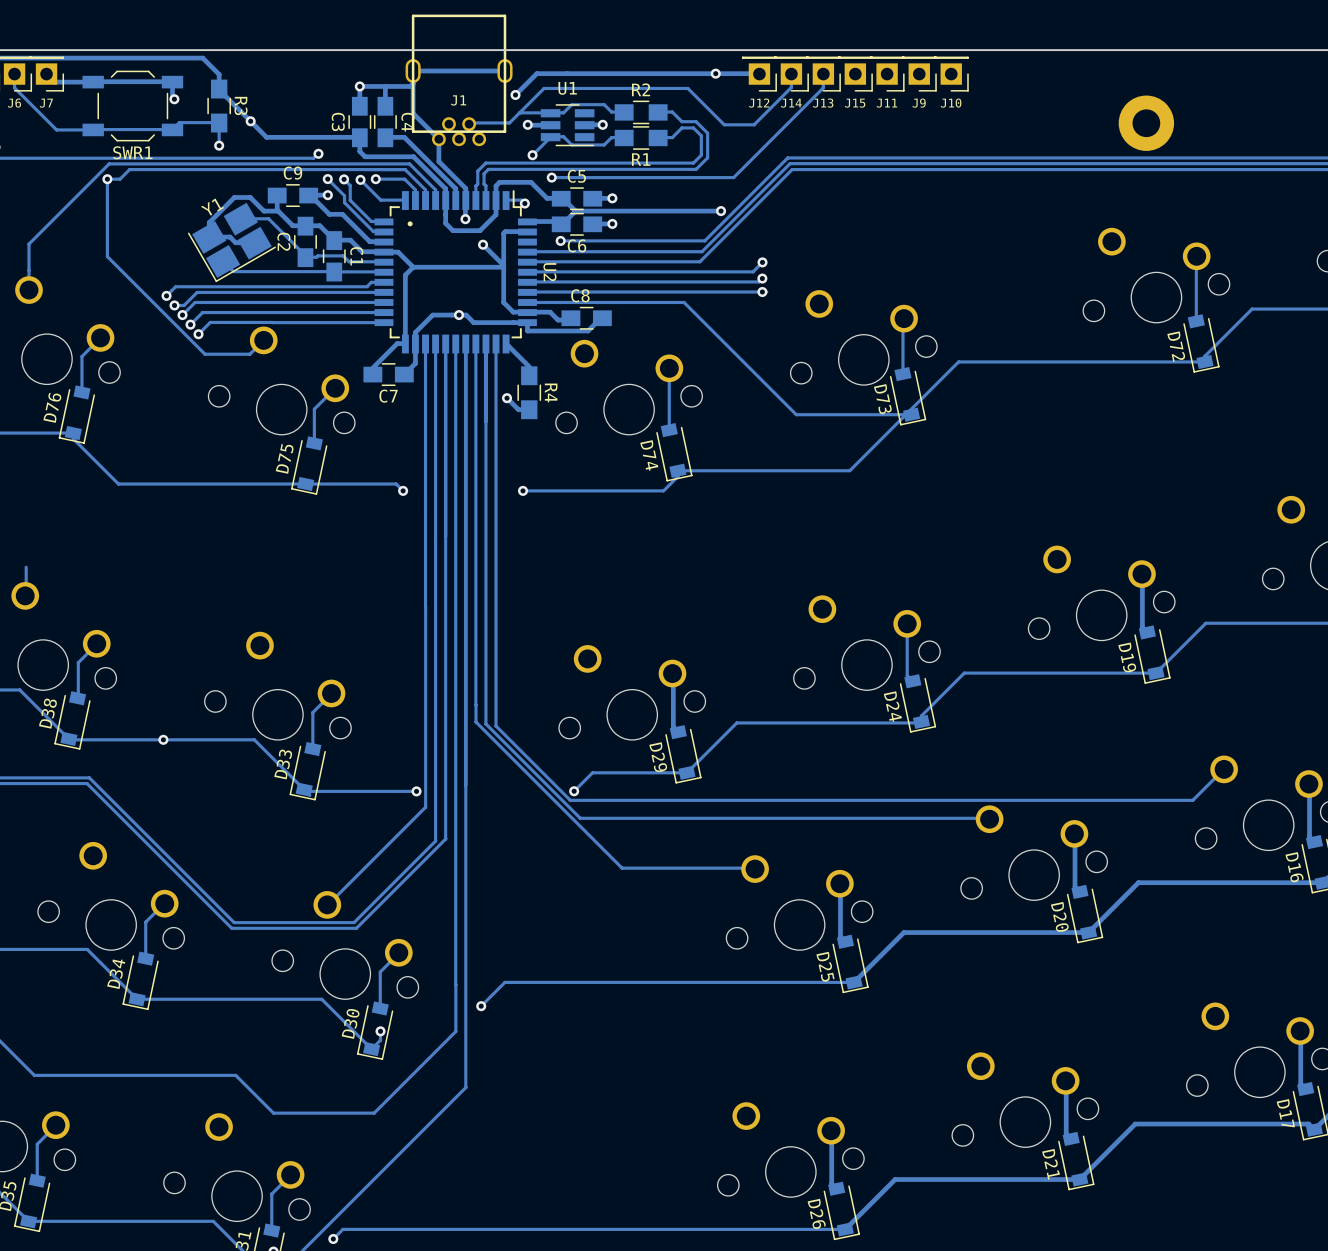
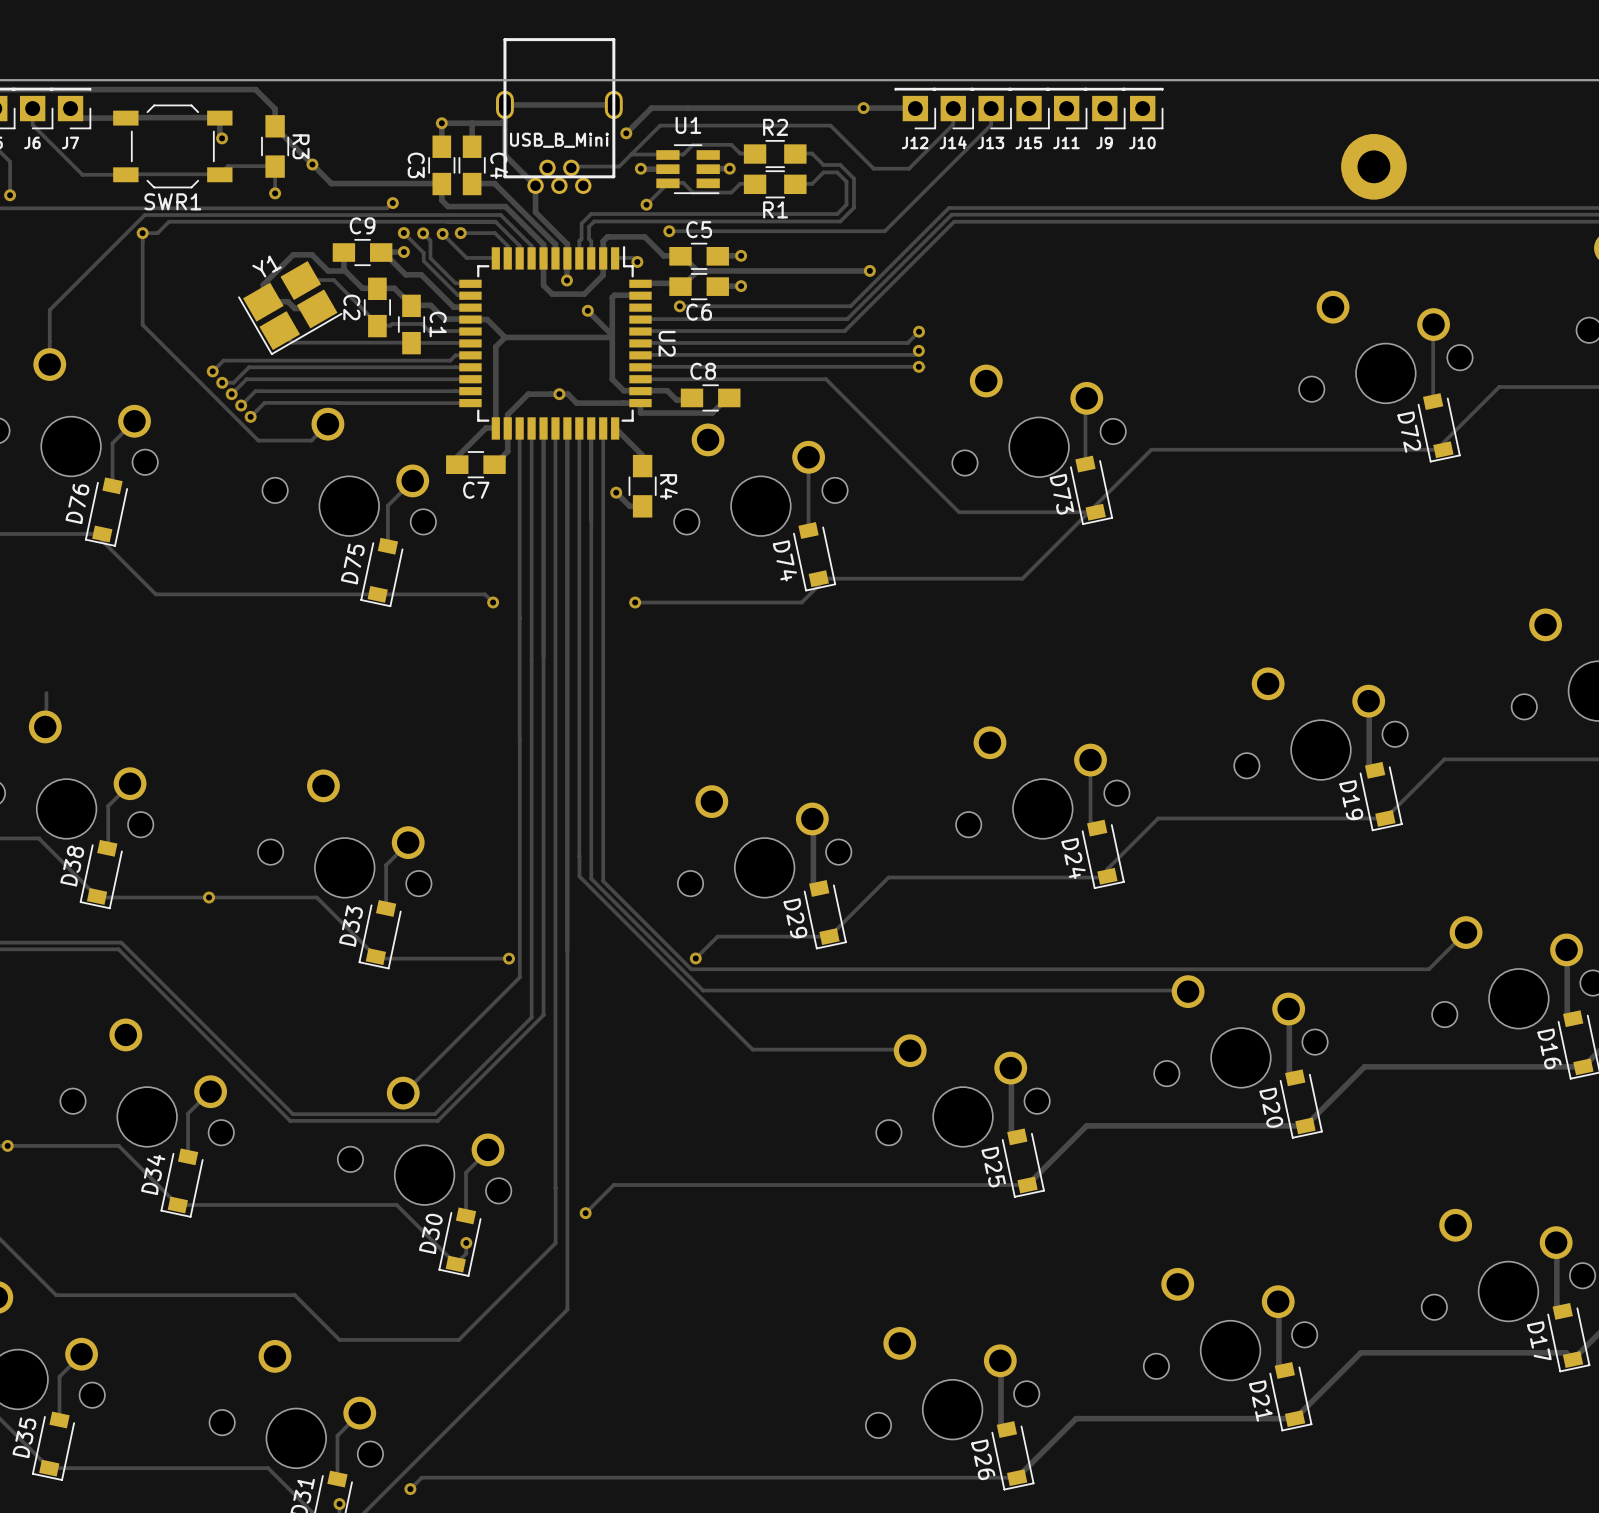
part value: J1 (458, 100) -> USB_B_Mini (559, 140)
text: • (410, 223) -> none

